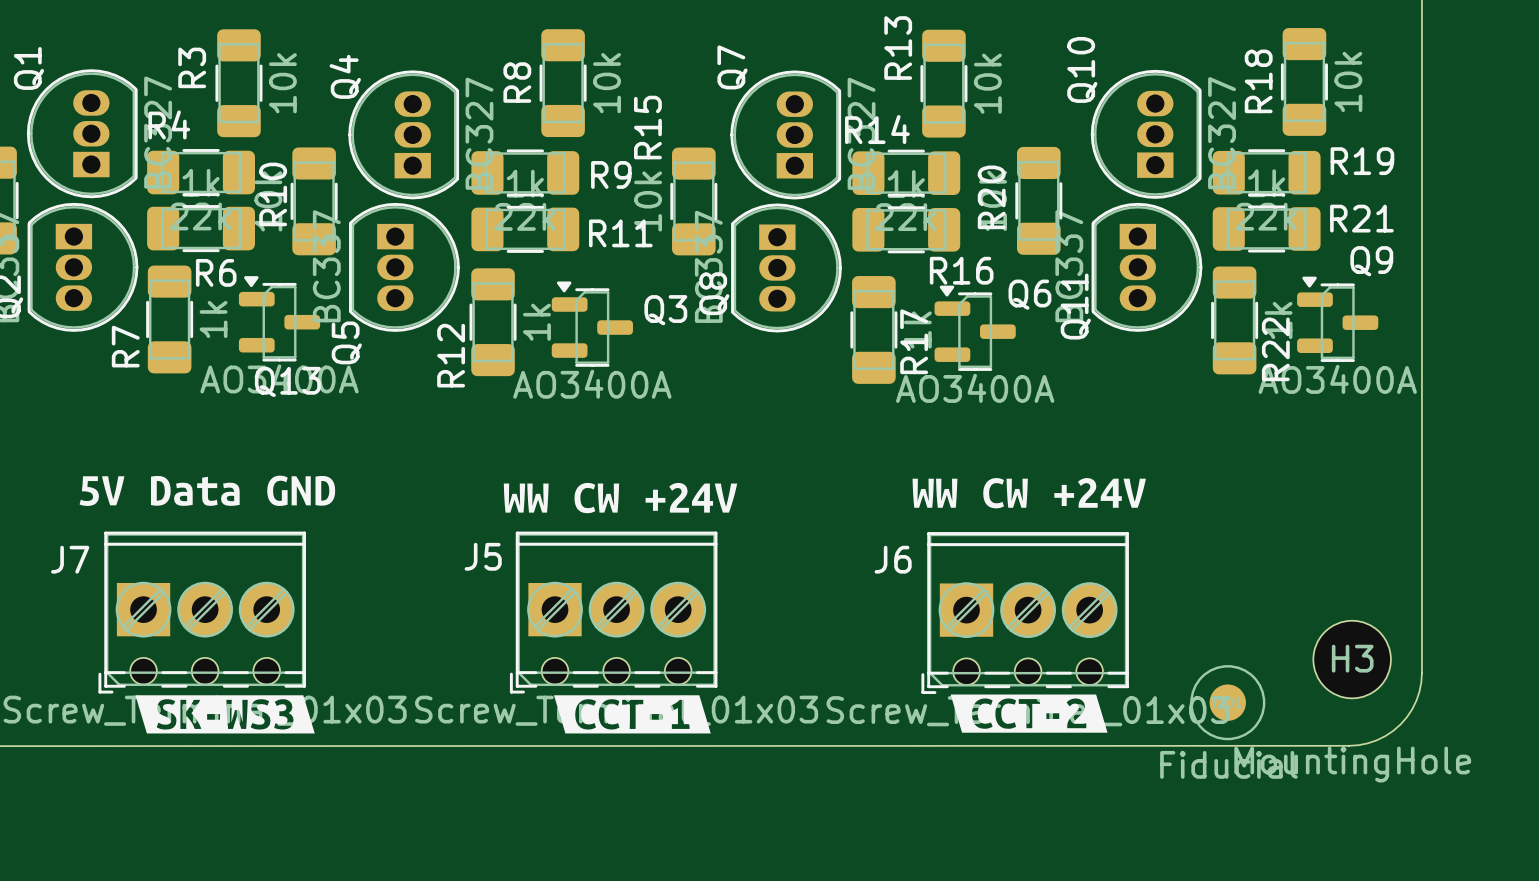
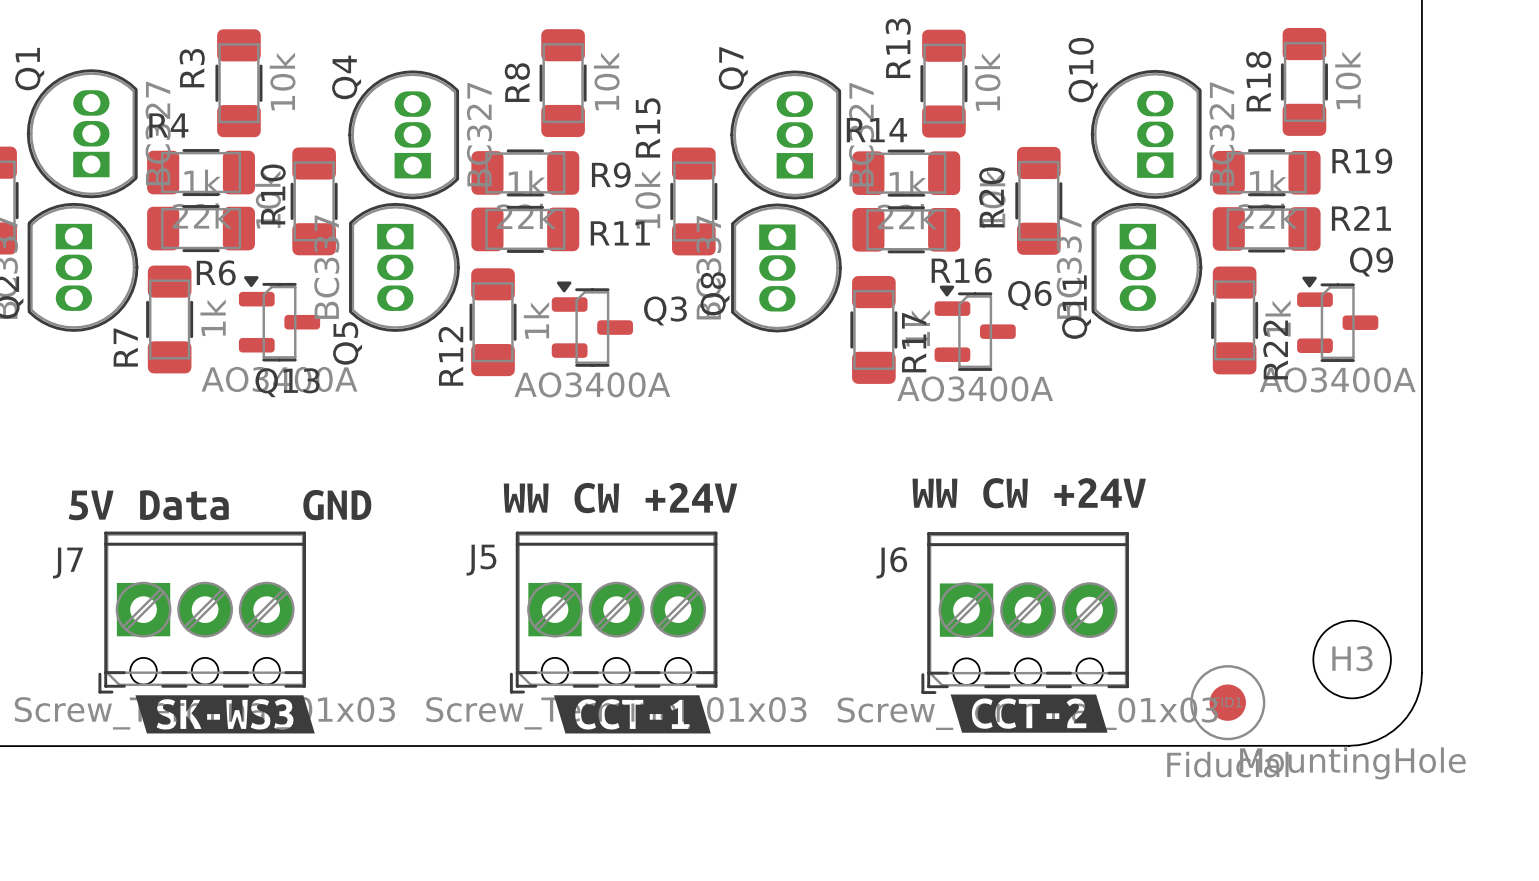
drawing shape: [79, 475, 336, 506] -> [68, 489, 372, 521]

